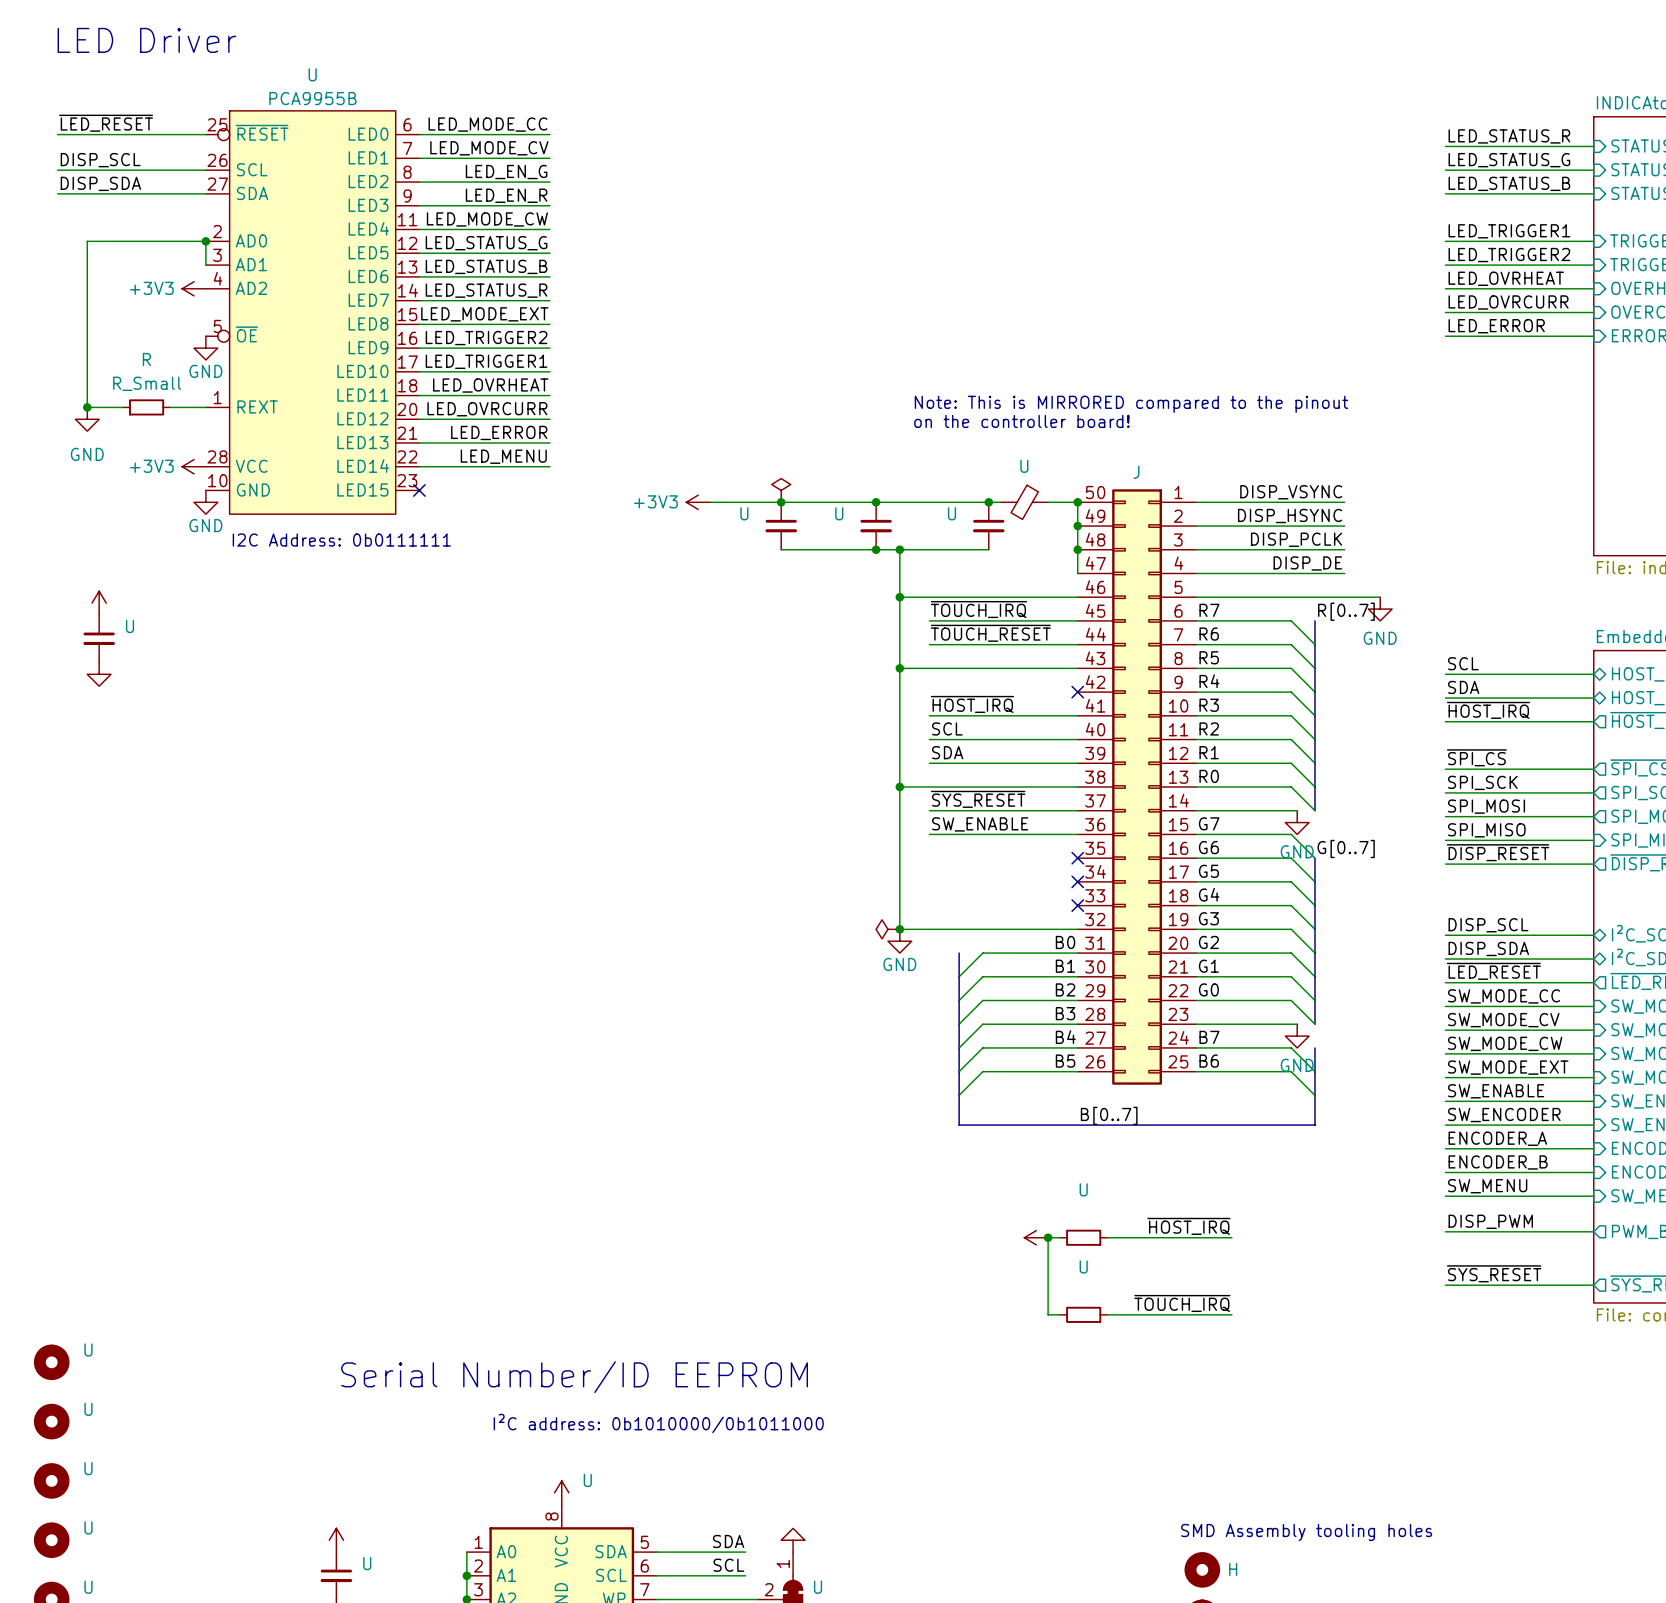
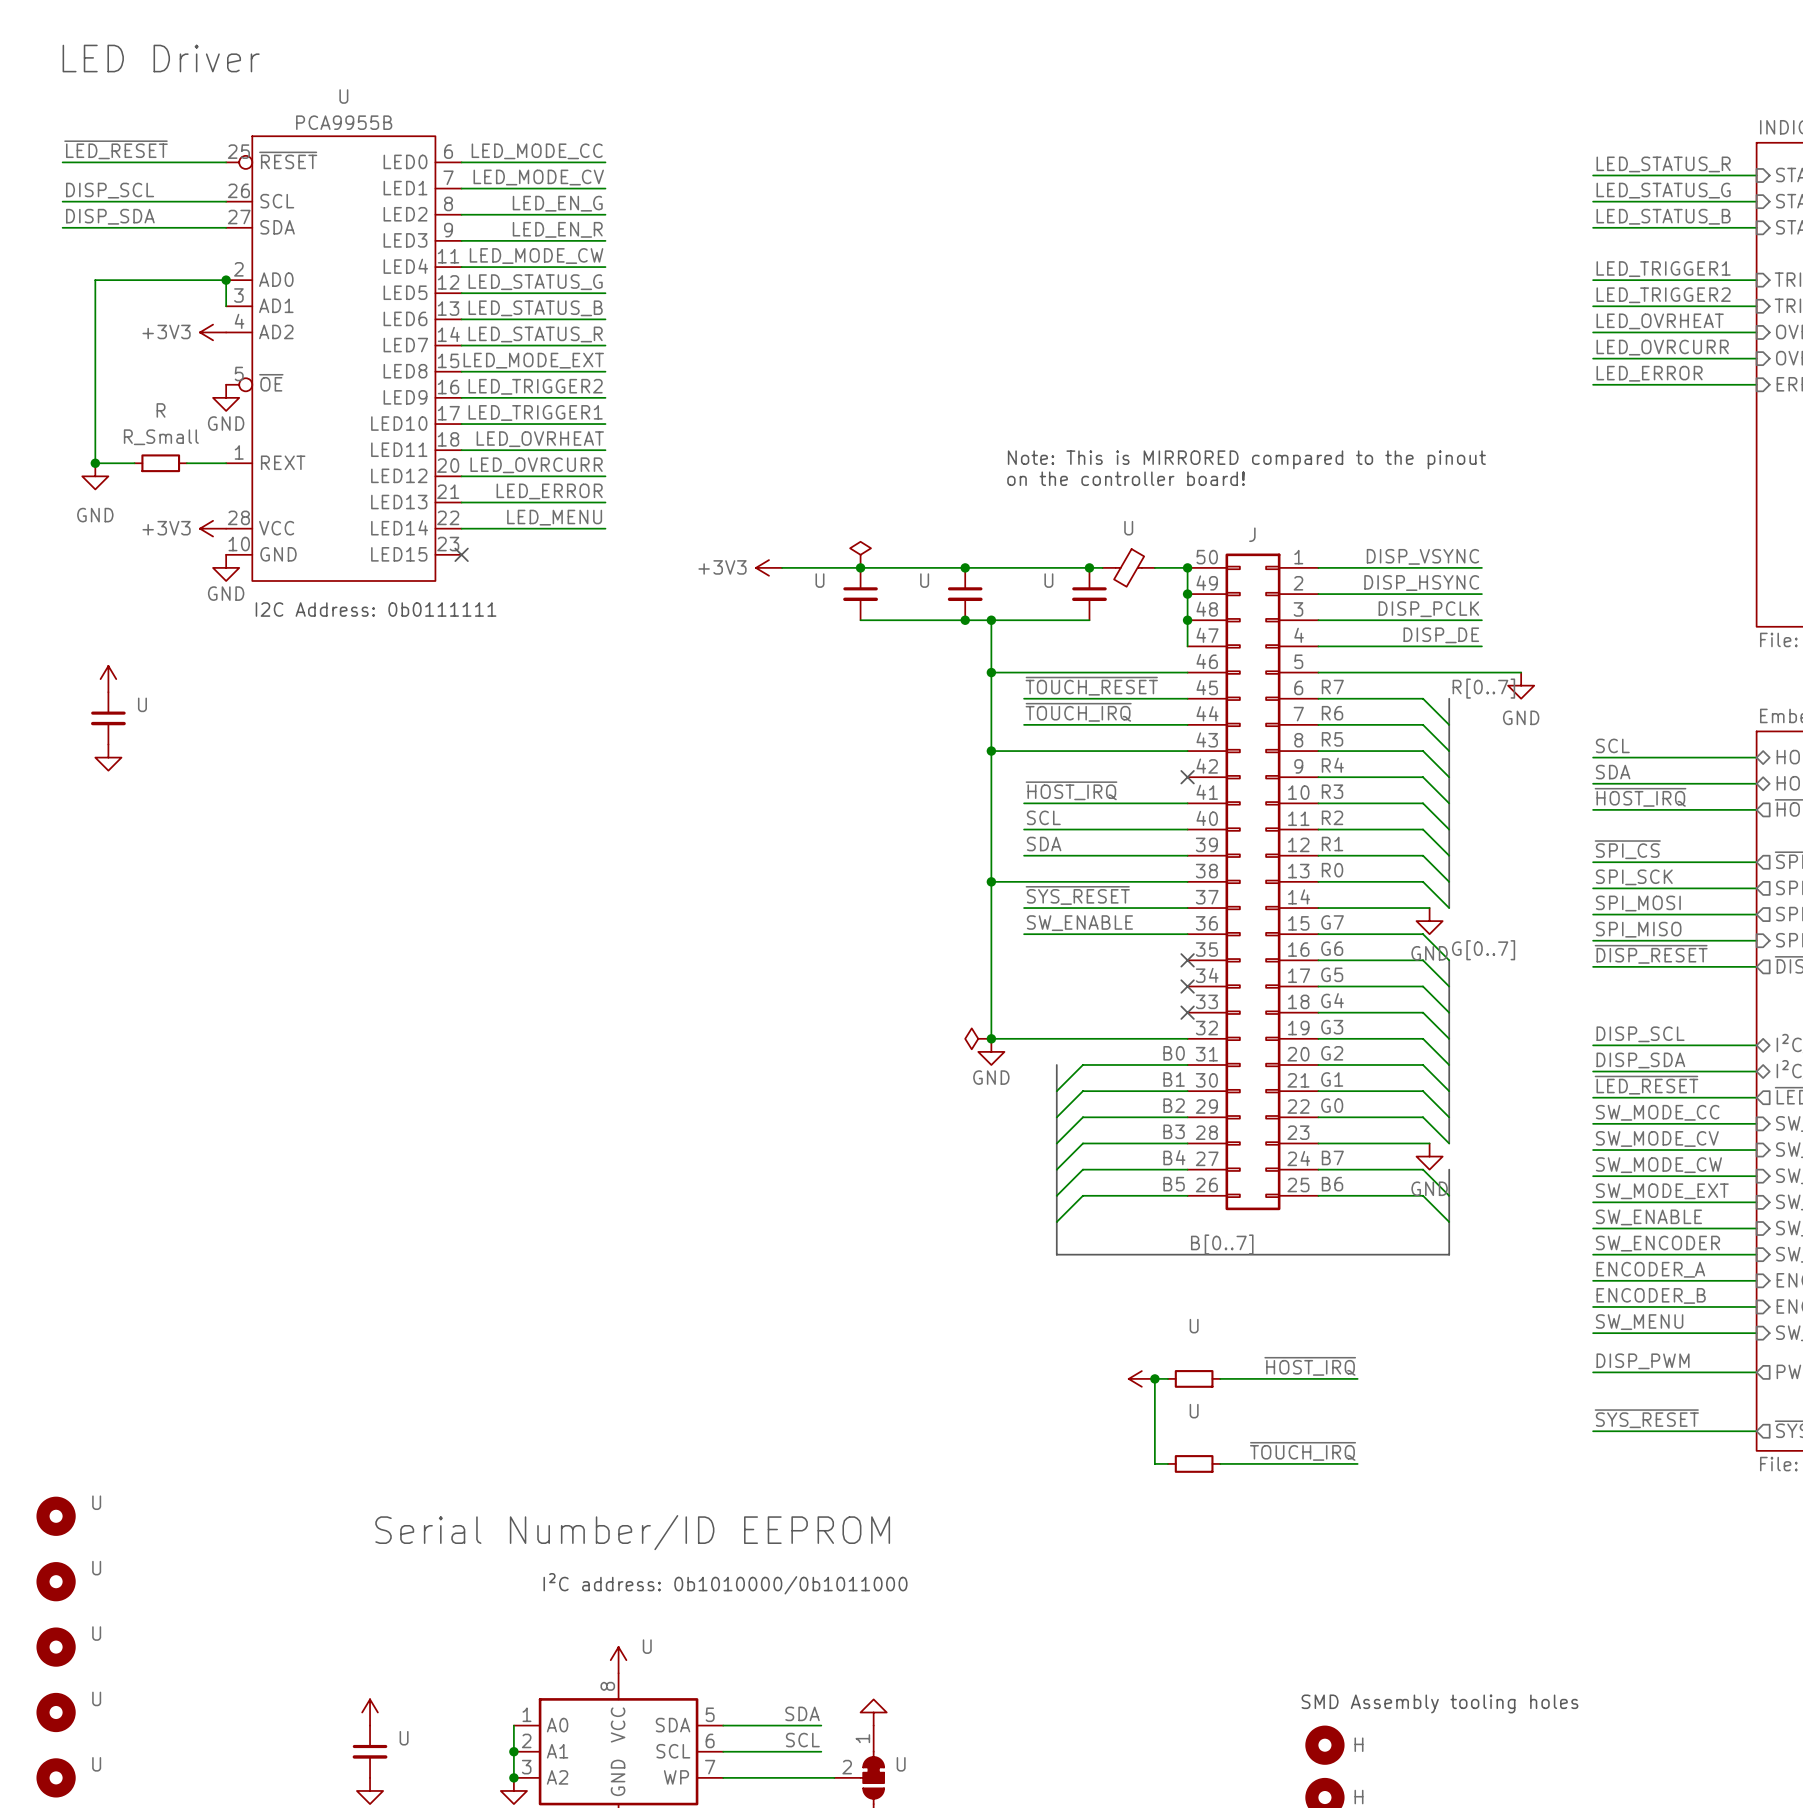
label: ~{TOUCH_IRQ} (978, 609) -> ~{TOUCH_RESET} (1091, 686)
label: ~{TOUCH_RESET} (990, 633) -> ~{TOUCH_IRQ} (1078, 712)

